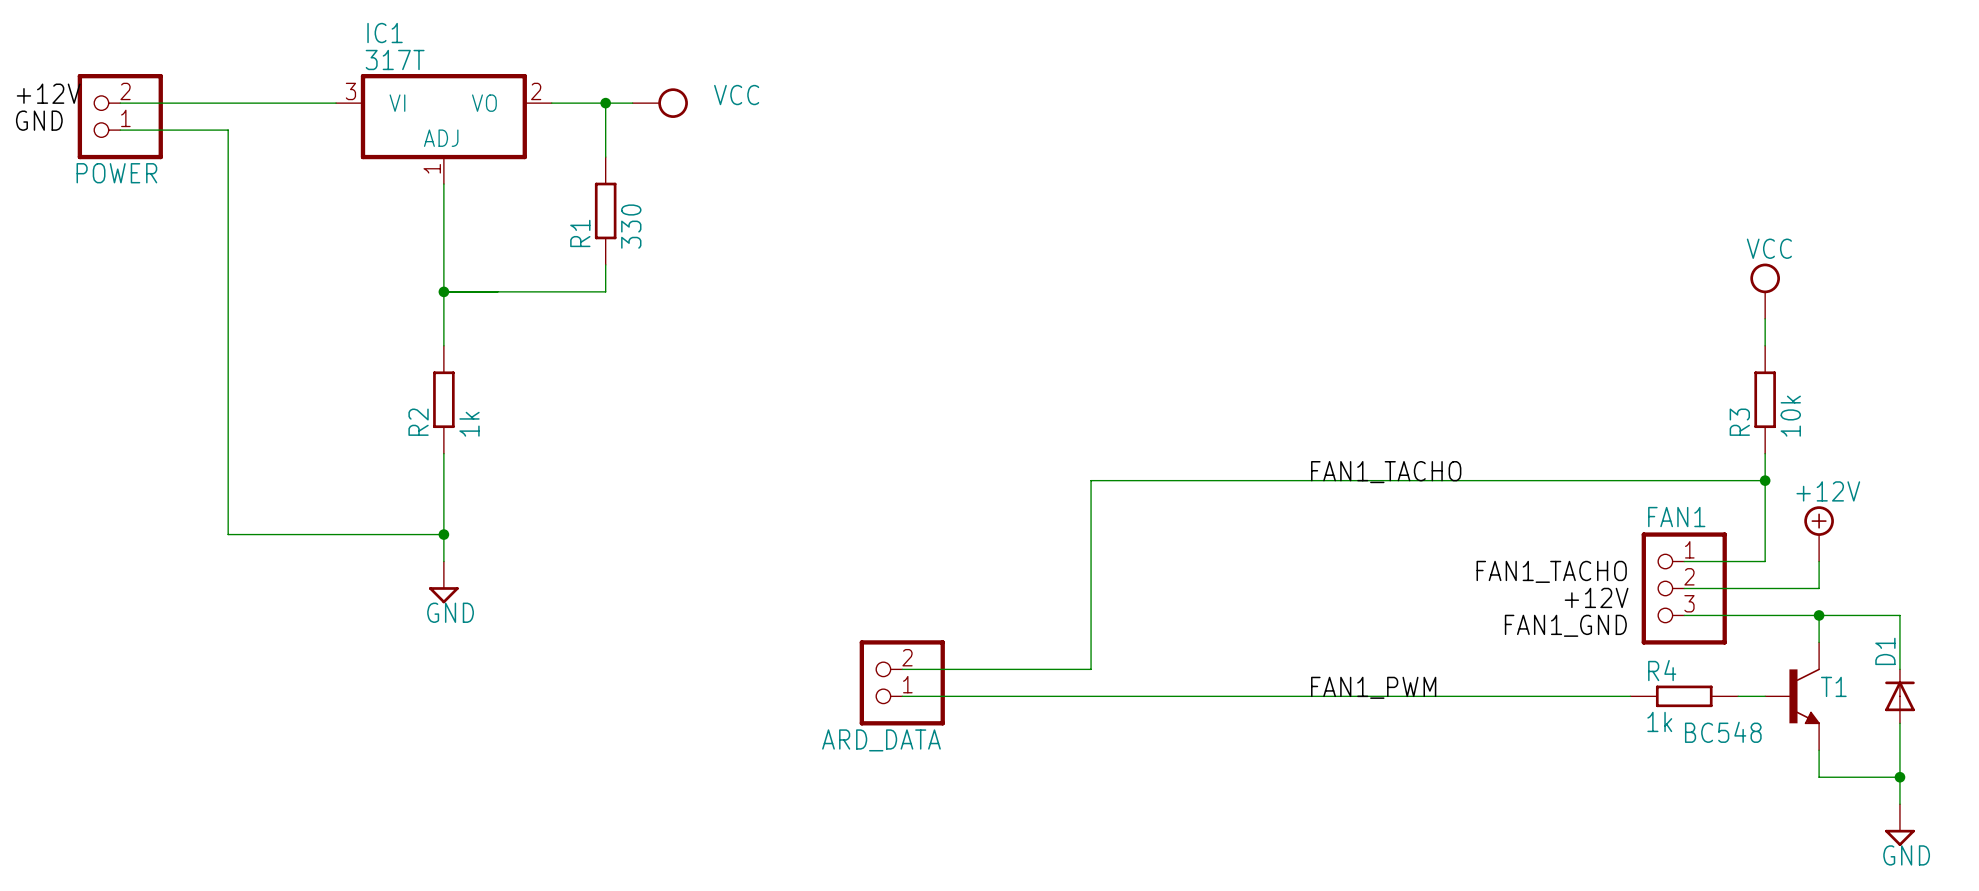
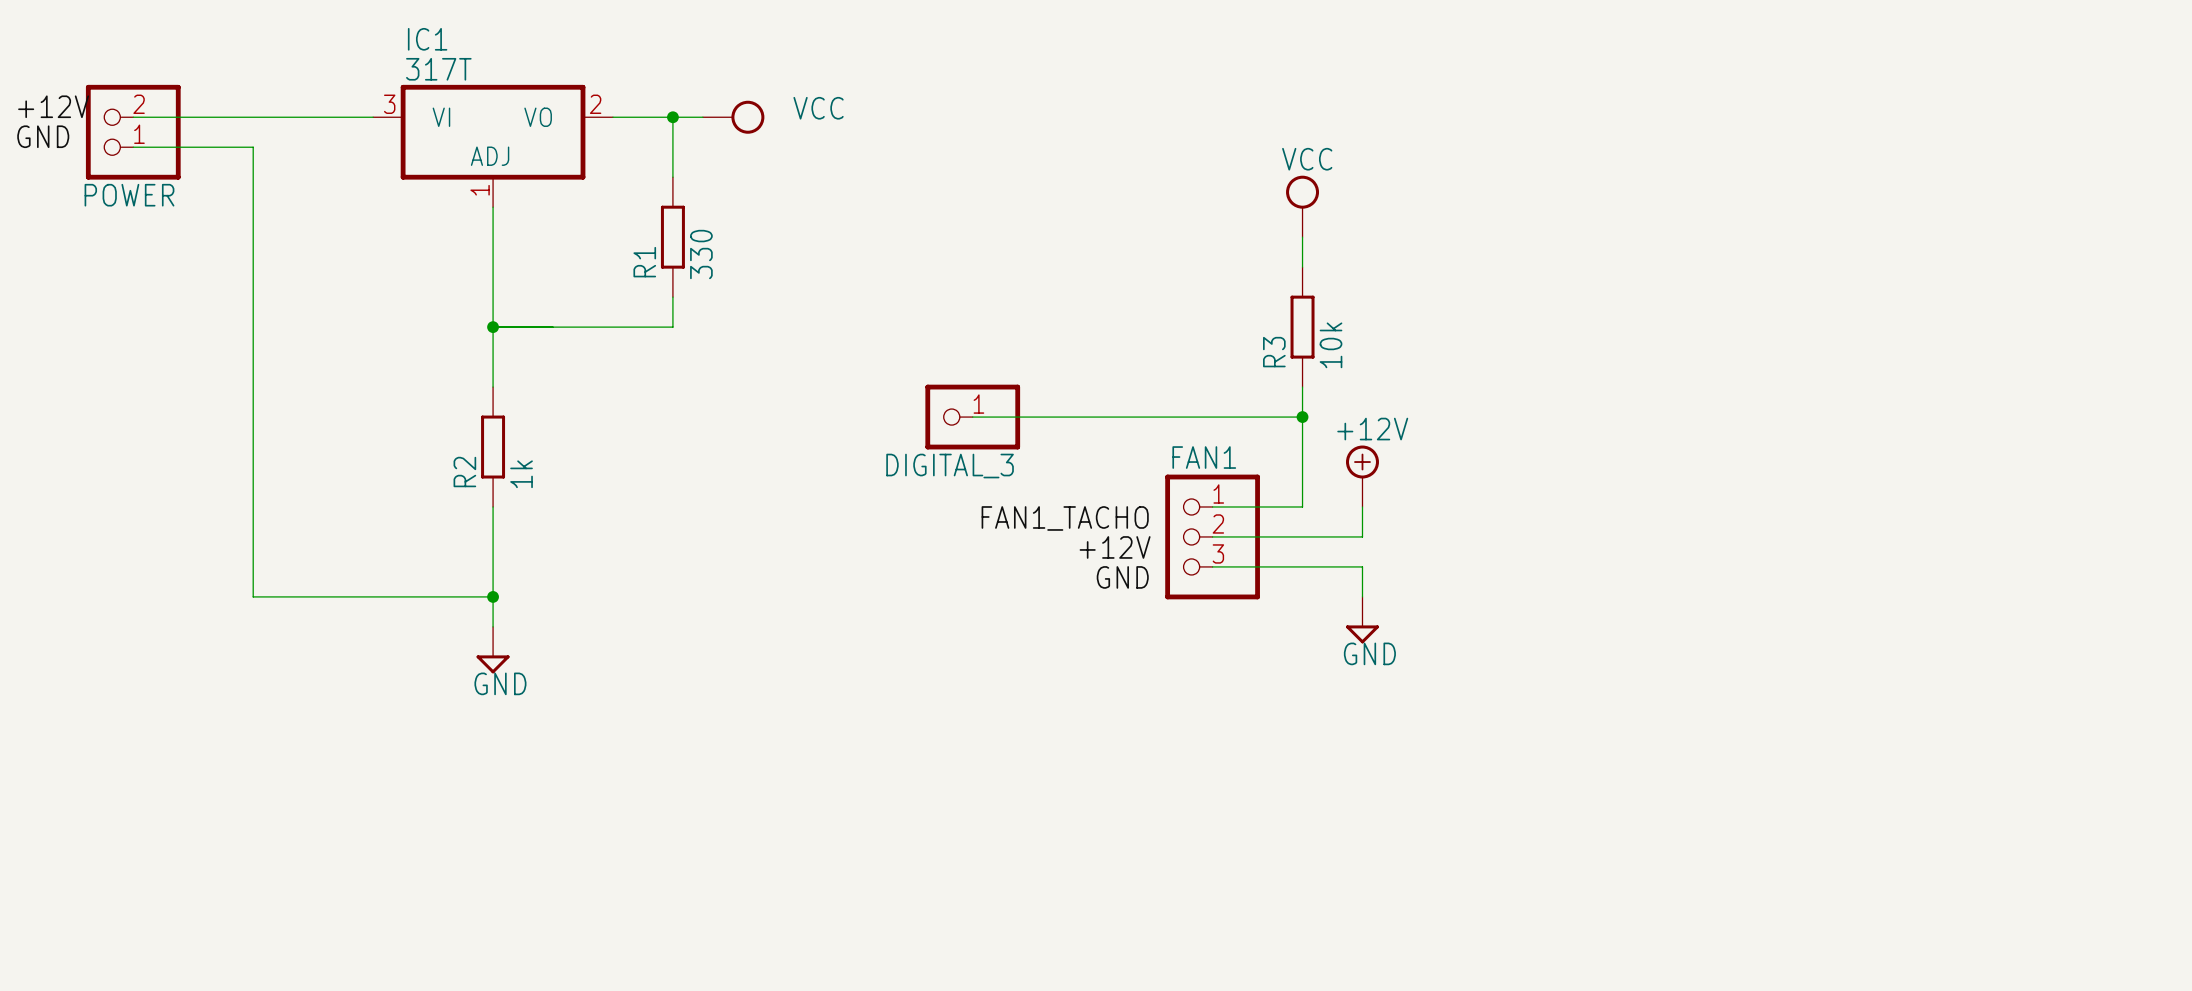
power symbol: none -> VCC (1302, 206)
wire: none -> (1302, 237) (1302, 267)
power symbol: VCC (1765, 291) -> none
wire: (1765, 318) (1765, 345) -> none
wire: none -> (1302, 387) (1302, 506) (1212, 506)
wire: none -> (972, 417) (1302, 417)
DIGITAL_3: none -> (972, 417)
junction: none -> (1302, 417)
R3 position: (1765, 399) -> (1302, 327)
power symbol: none -> +12V (1362, 476)
wire: (1765, 453) (1765, 561) (1684, 561) -> none
label: none -> FAN1_TACHO (1065, 518)
label: FAN1_TACHO (1386, 472) -> none
wire: (1091, 480) (1091, 669) (902, 669) -> none
wire: (1225, 480) (1765, 480) -> (1362, 536) (1362, 506)
junction: (1765, 480) -> none
label: none -> +12V (1115, 547)
wire: none -> (1212, 566) (1362, 566) (1362, 596)
label: none -> GND (1122, 577)
power symbol: +12V (1819, 533) -> none
power symbol: none -> GND (1362, 620)
wire: (1819, 561) (1819, 588) (1684, 588) -> none
label: FAN1_TACHO (1551, 571) -> none
FAN1 position: (1684, 588) -> (1212, 536)
label: +12V (1596, 597) -> none
wire: (1684, 615) (1899, 615) (1899, 669) -> none
wire: (1819, 615) (1819, 642) -> none
junction: (1819, 615) -> none
label: FAN1_GND (1565, 625) -> none
ARD_DATA: (902, 682) -> none
label: FAN1_PWM (1373, 687) -> none
wire: (902, 696) (1630, 696) -> none
R4: 1k (1684, 696) -> none
wire: (1738, 696) (1765, 696) -> none
T1: BC548 (1792, 696) -> none
D1: (1899, 696) -> none
wire: (1899, 723) (1899, 804) -> none
wire: (1819, 750) (1819, 777) (1899, 777) -> none
junction: (1899, 777) -> none
power symbol: GND (1899, 825) -> none

